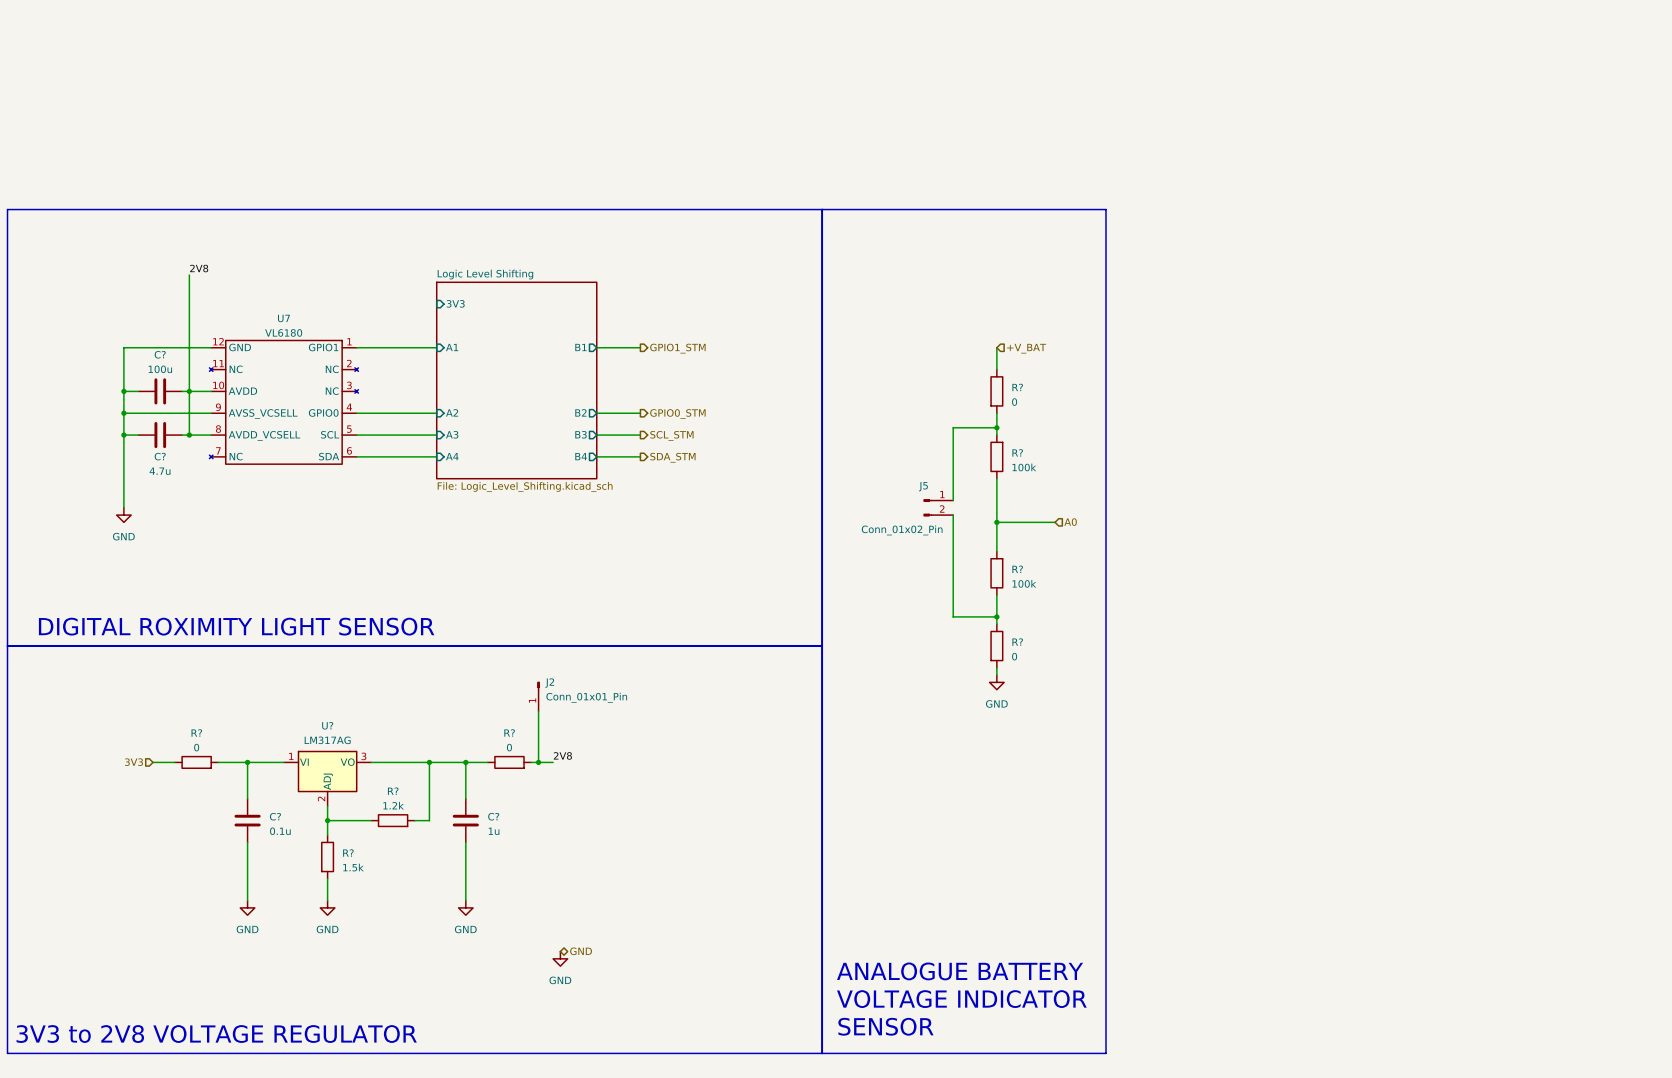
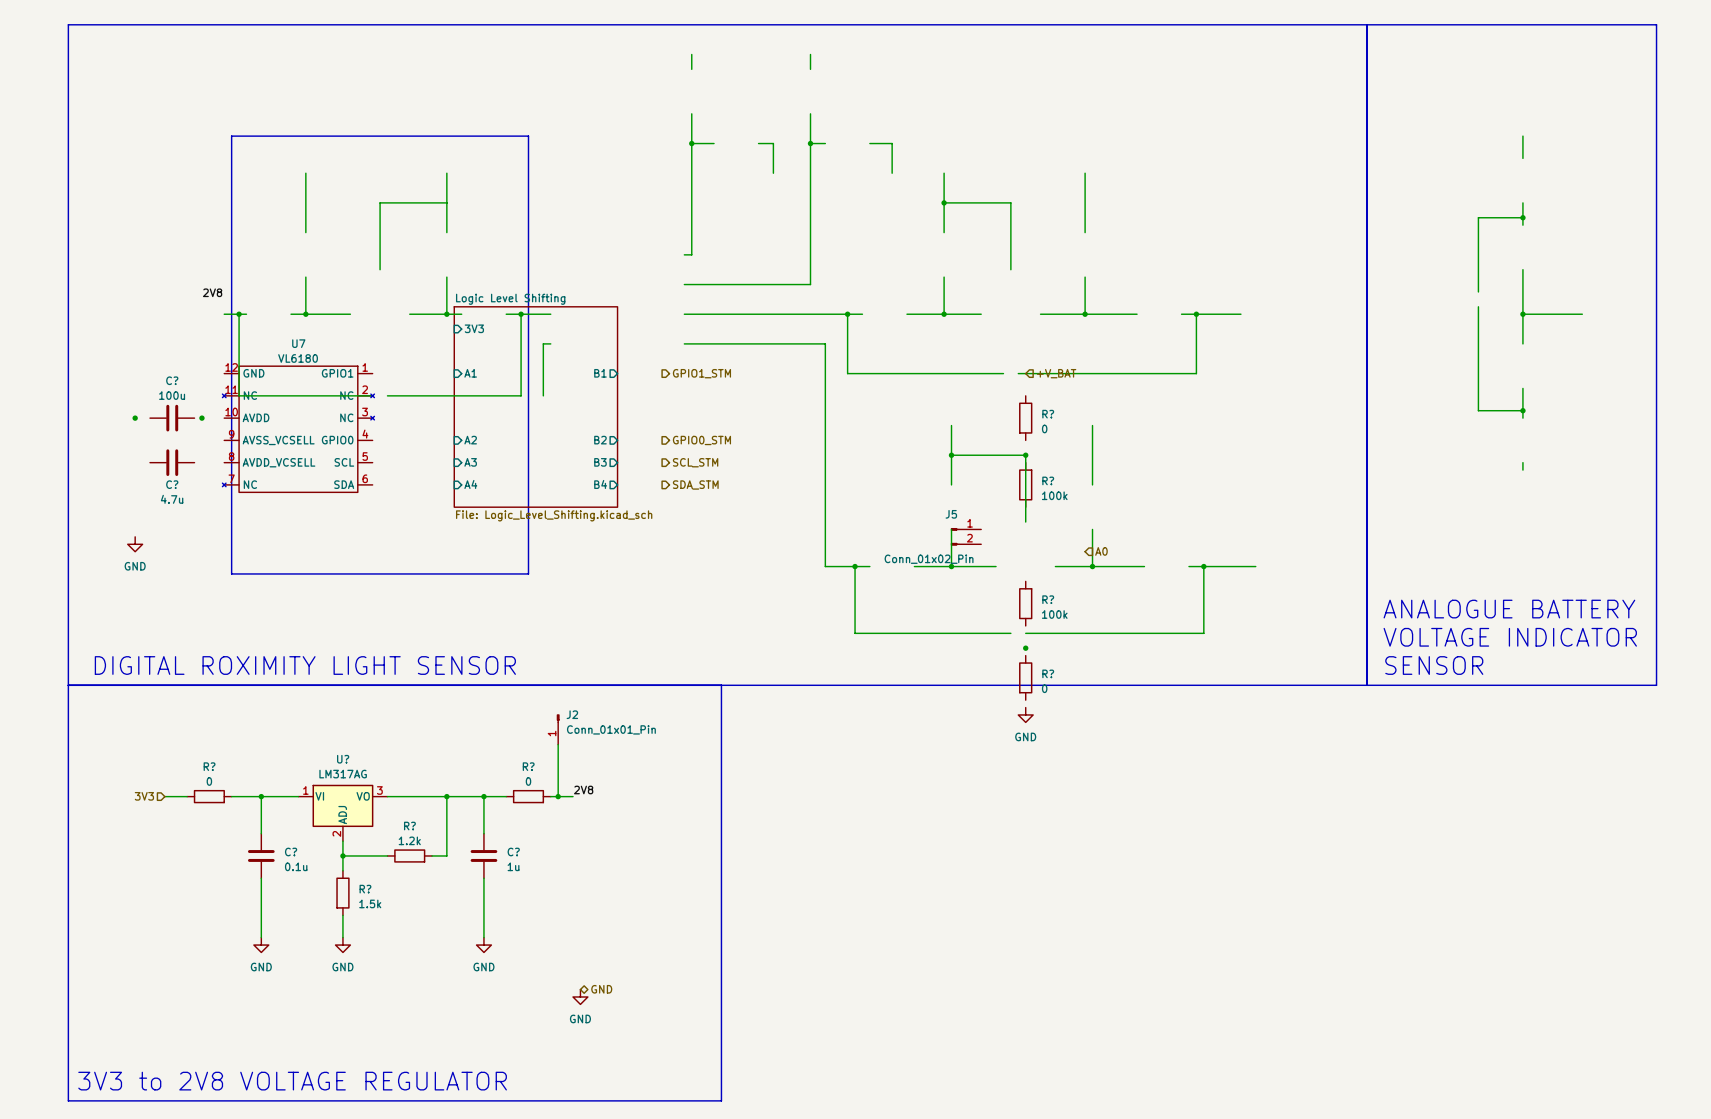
line: none -> (1367, 24) (1367, 685)
wire: none -> (691, 54) (691, 69)
wire: none -> (810, 54) (810, 69)
wire: none -> (691, 113) (691, 254) (684, 254)
wire: none -> (810, 113) (810, 284) (684, 284)
line: none -> (231, 136) (528, 136) (528, 573) (231, 573) (231, 136)
wire: none -> (1522, 136) (1522, 158)
wire: none -> (691, 143) (714, 143)
junction: none -> (691, 143)
wire: none -> (758, 143) (773, 143) (773, 173)
wire: none -> (810, 143) (825, 143)
junction: none -> (810, 143)
wire: none -> (869, 143) (892, 143) (892, 173)
wire: none -> (305, 173) (305, 232)
wire: none -> (446, 173) (446, 232)
wire: none -> (944, 173) (944, 232)
wire: none -> (1085, 173) (1085, 232)
wire: none -> (446, 202) (380, 202) (380, 269)
wire: none -> (944, 202) (1010, 202) (1010, 269)
junction: none -> (944, 202)
wire: none -> (1522, 202) (1522, 225)
wire: none -> (1522, 217) (1478, 217) (1478, 291)
junction: none -> (1522, 217)
line: (7, 209) (7, 1053) (1105, 1053) (1105, 209) (7, 209) -> none
line: (822, 209) (822, 1053) -> none
wire: none -> (1522, 269) (1522, 343)
wire: none -> (305, 277) (305, 314)
wire: none -> (446, 277) (446, 314)
wire: none -> (944, 277) (944, 314)
wire: none -> (1085, 277) (1085, 314)
wire: (189, 275) (189, 435) -> none
wire: none -> (1478, 306) (1478, 410) (1522, 410)
wire: none -> (224, 314) (246, 314)
wire: none -> (239, 314) (239, 395) (372, 395)
junction: none -> (239, 314)
wire: none -> (291, 314) (350, 314)
junction: none -> (305, 314)
wire: none -> (409, 314) (461, 314)
junction: none -> (446, 314)
wire: none -> (521, 314) (521, 395) (387, 395)
junction: none -> (521, 314)
wire: none -> (684, 314) (862, 314)
wire: none -> (847, 314) (847, 373) (1003, 373)
junction: none -> (847, 314)
wire: none -> (906, 314) (981, 314)
junction: none -> (944, 314)
wire: none -> (1040, 314) (1137, 314)
junction: none -> (1085, 314)
wire: none -> (1181, 314) (1240, 314)
wire: none -> (1196, 314) (1196, 373) (1018, 373)
junction: none -> (1196, 314)
wire: none -> (1522, 314) (1582, 314)
junction: none -> (1522, 314)
wire: none -> (550, 343) (543, 343) (543, 395)
wire: none -> (684, 343) (825, 343) (825, 566) (869, 566)
wire: (211, 347) (123, 347) (123, 507) -> none
wire: (356, 347) (436, 347) -> none
wire: (596, 347) (640, 347) -> (506, 314) (550, 314)
wire: (996, 347) (996, 369) -> none
wire: none -> (1522, 388) (1522, 418)
junction: none -> (1522, 410)
wire: (123, 391) (138, 391) -> none
wire: (182, 391) (211, 391) -> none
wire: none -> (951, 425) (951, 484)
wire: (123, 413) (211, 413) -> none
junction: (123, 413) -> none
wire: (356, 413) (436, 413) -> none
wire: (596, 413) (640, 413) -> none
wire: (996, 413) (996, 427) -> none
junction: none -> (951, 455)
wire: (953, 427) (953, 500) -> (981, 455) (951, 455)
wire: (123, 435) (138, 435) -> none
junction: (123, 435) -> none
wire: (182, 435) (211, 435) -> none
junction: (189, 435) -> none
wire: (356, 435) (436, 435) -> none
wire: (596, 435) (640, 435) -> none
wire: none -> (1025, 462) (1025, 507)
wire: none -> (1522, 462) (1522, 470)
wire: (356, 456) (436, 456) -> none
wire: (596, 456) (640, 456) -> none
wire: (996, 493) (996, 551) -> (1092, 425) (1092, 484)
wire: none -> (951, 529) (951, 566)
wire: none -> (1092, 529) (1092, 566)
wire: (953, 515) (953, 616) (996, 616) -> none
wire: (996, 522) (1055, 522) -> none
junction: (996, 522) -> none
wire: none -> (855, 566) (855, 633) (1010, 633)
junction: none -> (855, 566)
wire: none -> (914, 566) (996, 566)
junction: none -> (951, 566)
wire: none -> (1055, 566) (1144, 566)
junction: none -> (1092, 566)
wire: none -> (1188, 566) (1255, 566)
wire: none -> (1203, 566) (1203, 633) (1025, 633)
junction: none -> (1203, 566)
text: none -> ANALOGUE BATTERY (1509, 609)
wire: (996, 595) (996, 624) -> none
text: none -> VOLTAGE INDICATOR (1510, 637)
text position: DIGITAL ROXIMITY LIGHT SENSOR (236, 626) -> DIGITAL ROXIMITY LIGHT SENSOR (305, 665)
text: none -> SENSOR (1434, 665)
line: (7, 646) (822, 646) -> none
line: none -> (68, 685) (1656, 685) (1656, 24) (68, 24) (68, 1100) (721, 1100) (721, 685)
wire: (996, 667) (996, 675) -> none
text: ANALOGUE BATTERY (960, 971) -> none
text: VOLTAGE INDICATOR (961, 999) -> none
text: SENSOR (885, 1026) -> none
text position: 3V3 to 2V8 VOLTAGE REGULATOR (216, 1034) -> 3V3 to 2V8 VOLTAGE REGULATOR (292, 1081)

